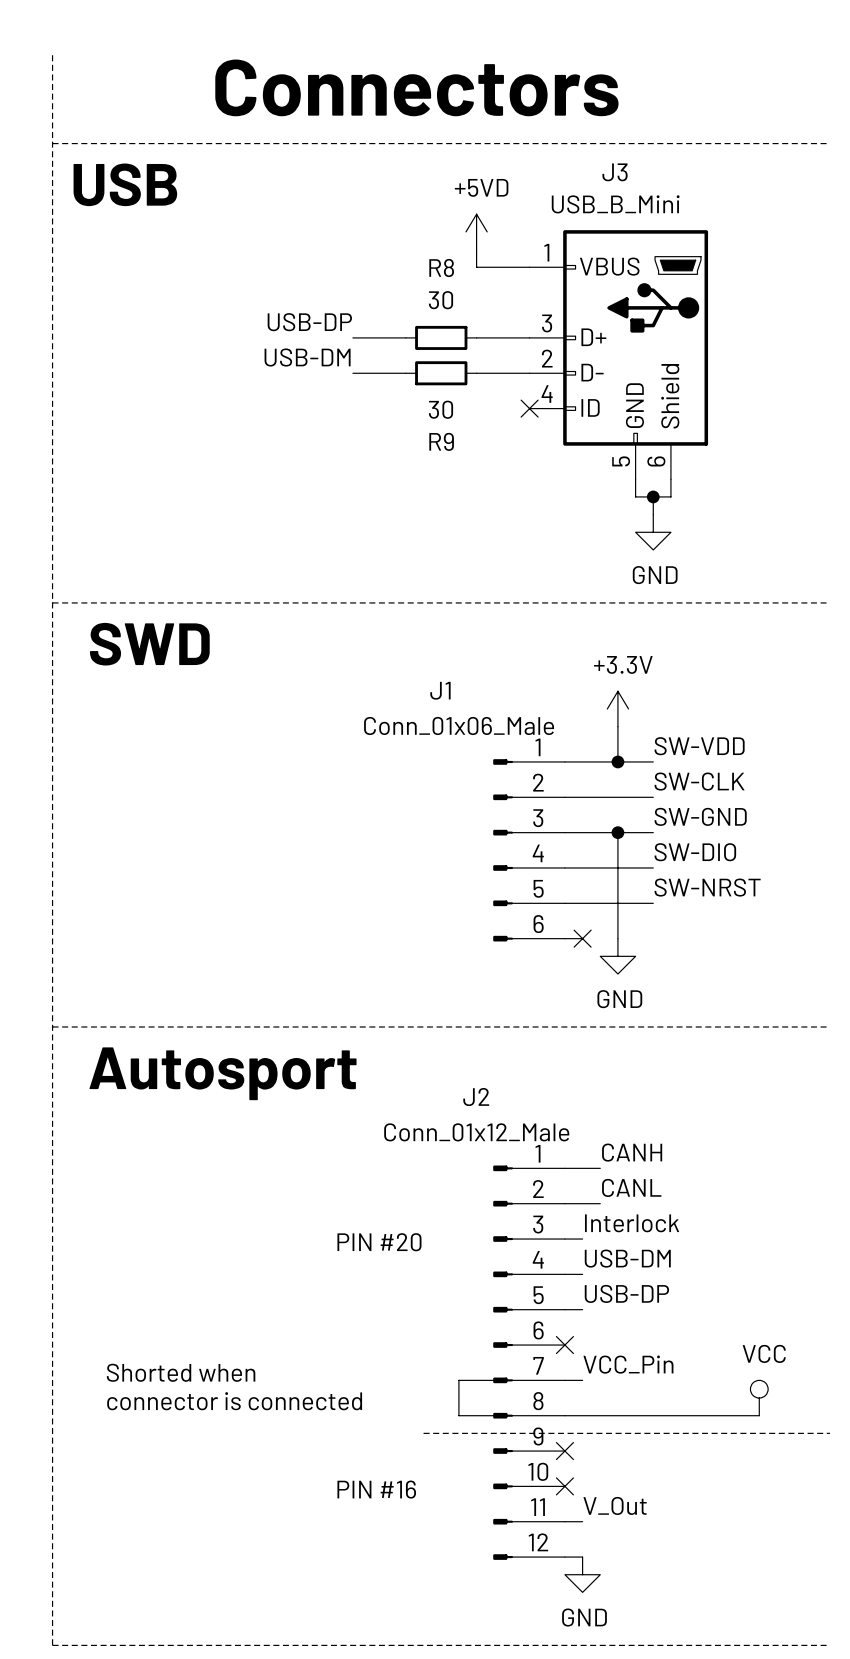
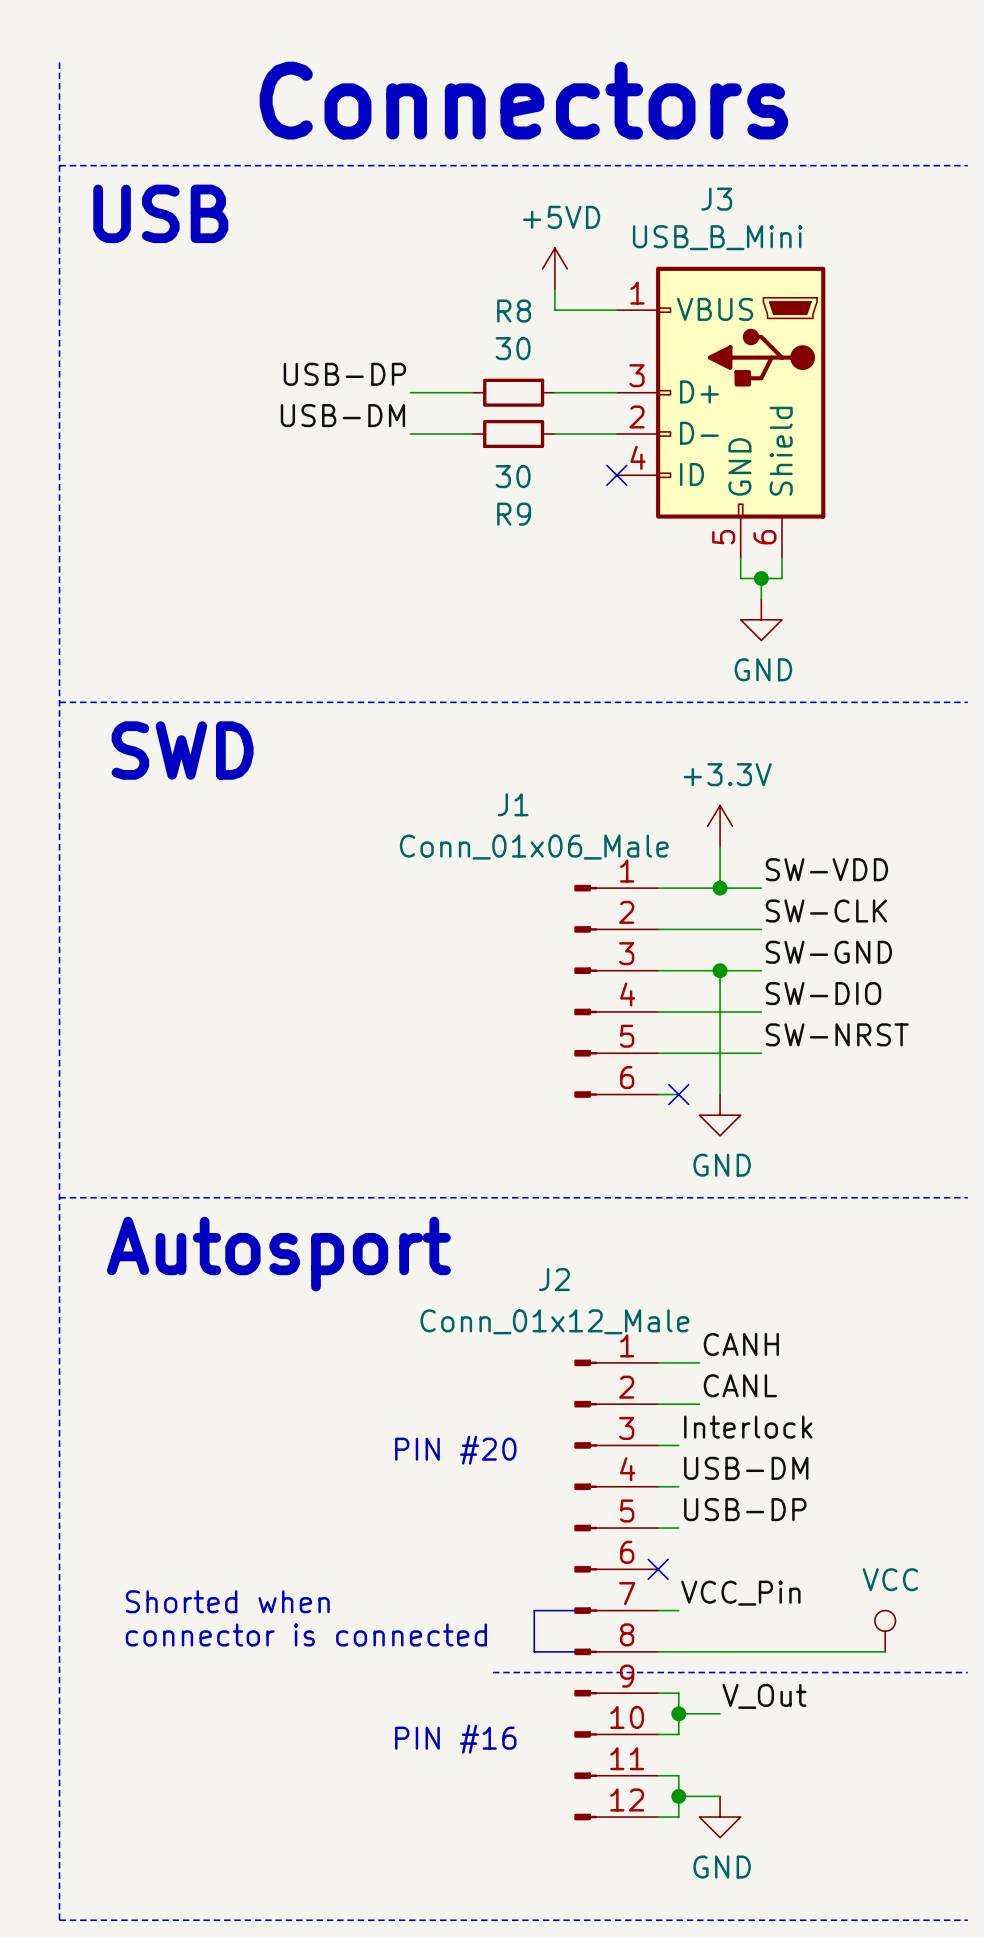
wire: none -> (658, 1693) (678, 1693) (678, 1734) (658, 1734)
no-connect mark: (564, 1451) -> none
wire: none -> (678, 1713) (720, 1713)
junction: none -> (678, 1713)
no-connect mark: (564, 1486) -> none
label position: V_Out (615, 1505) -> V_Out (764, 1696)
wire: none -> (678, 1775) (678, 1817)
wire: none -> (678, 1796) (720, 1796)
junction: none -> (678, 1796)
power symbol position: GND (582, 1574) -> GND (720, 1817)

